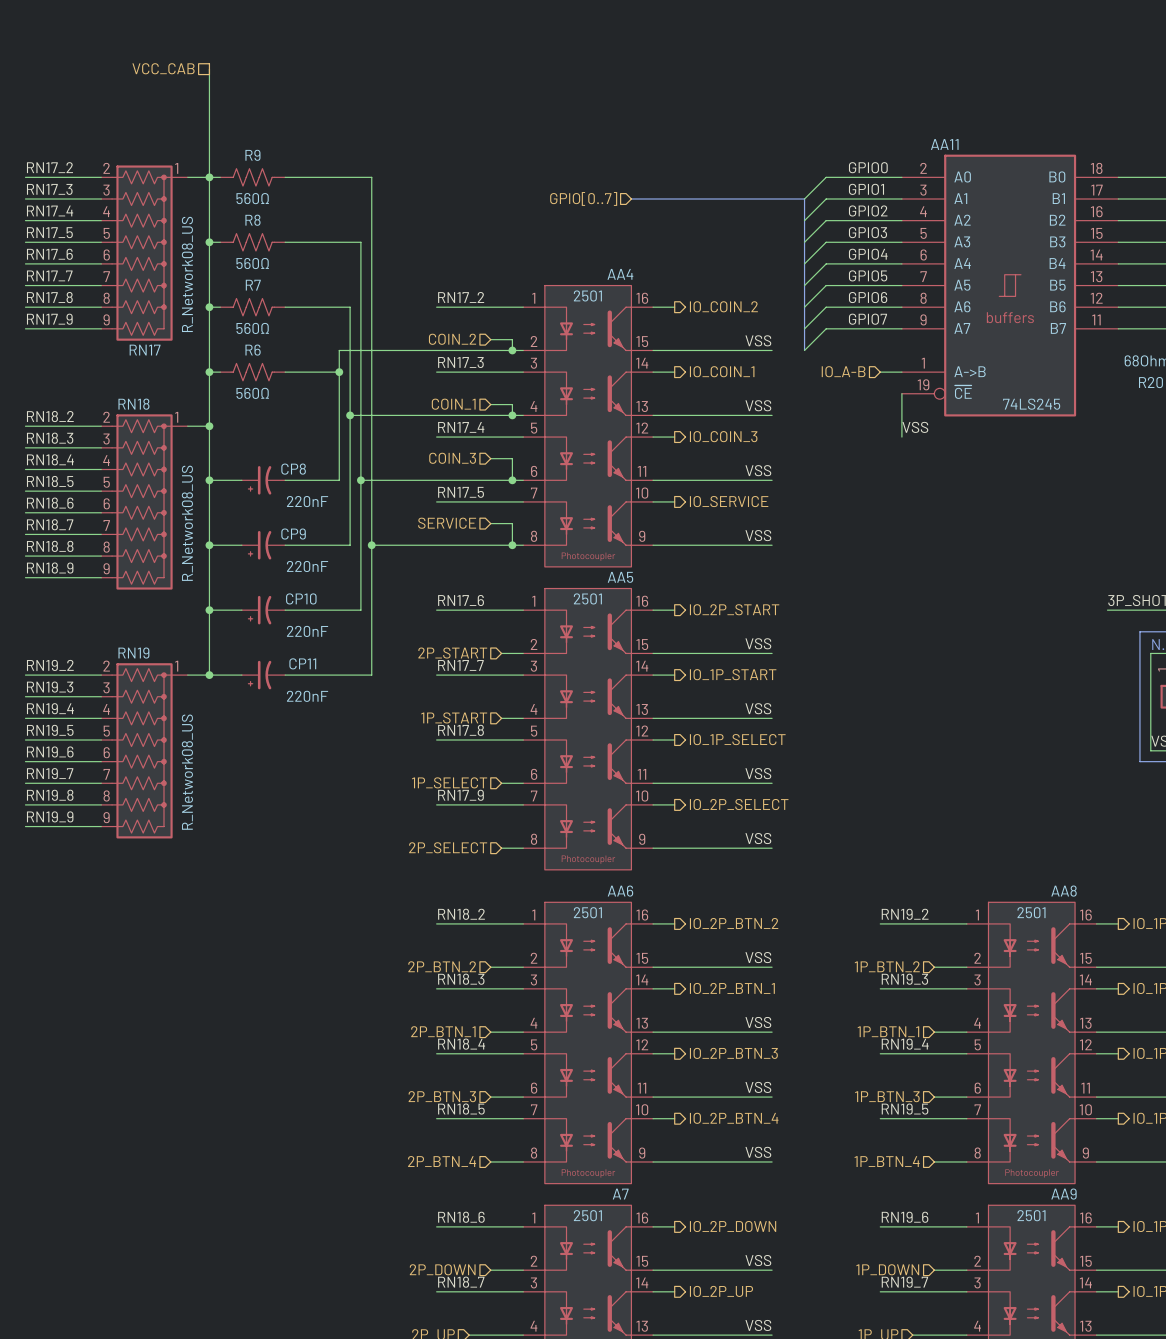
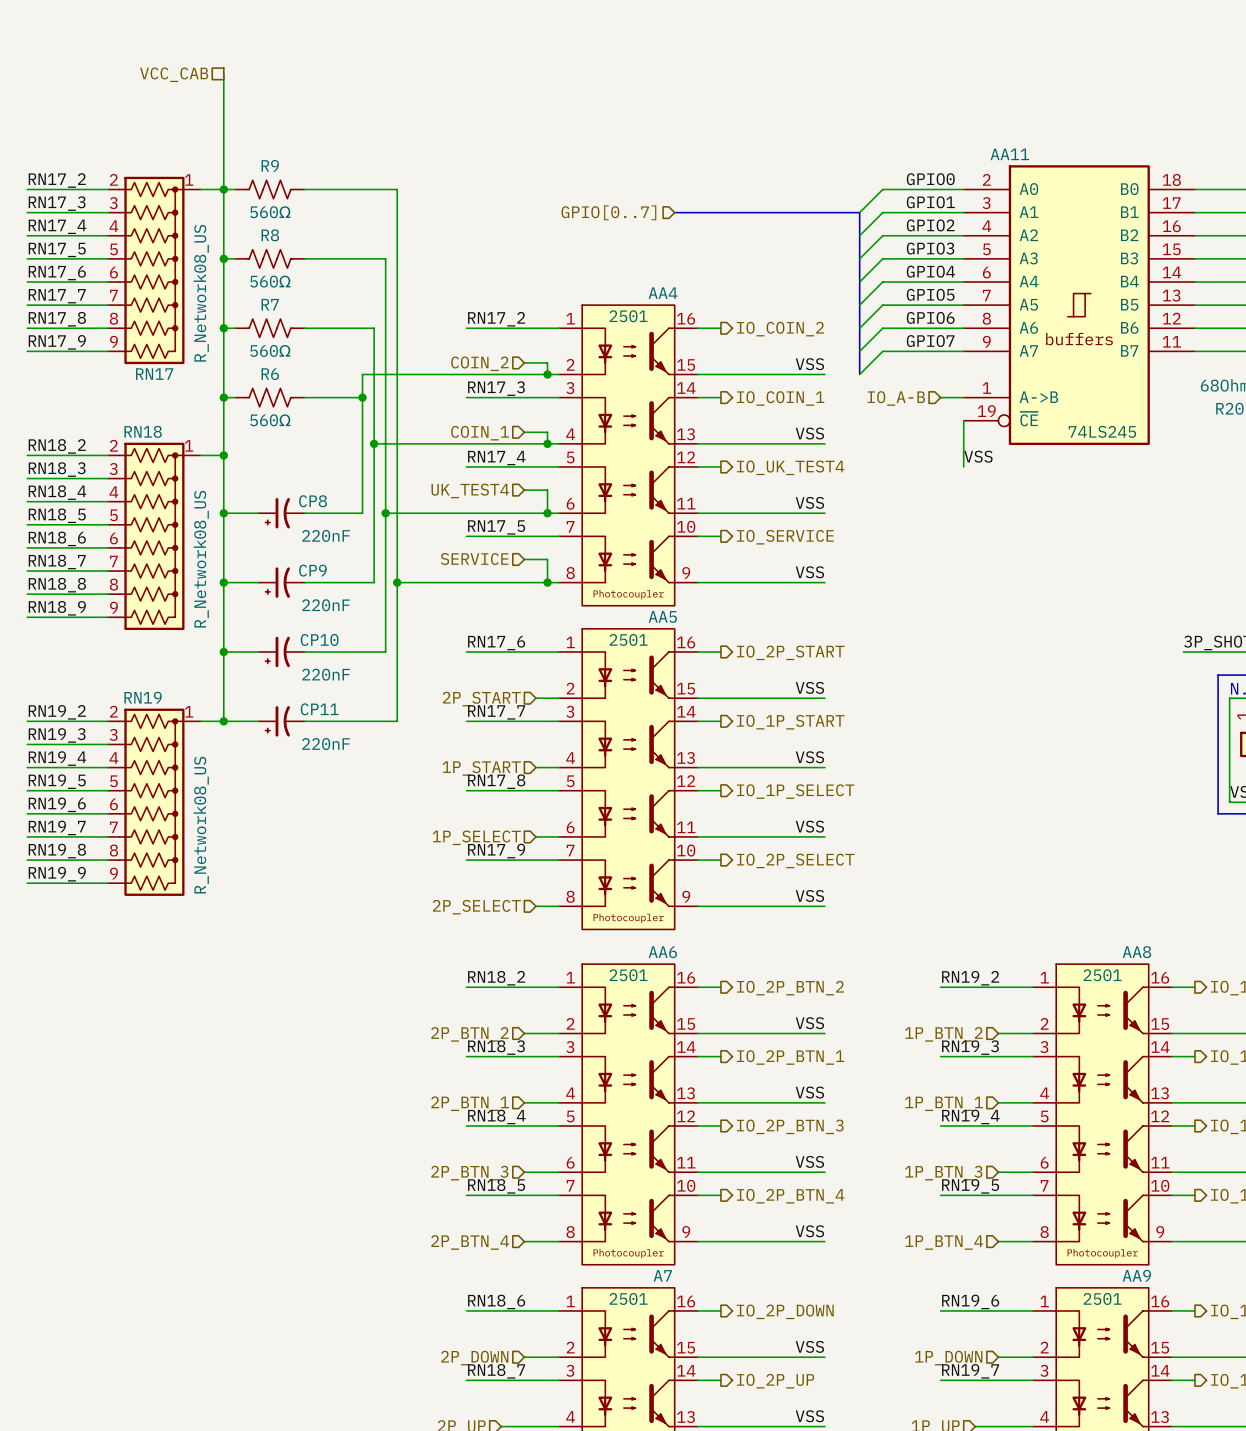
hierarchical label: IO_COIN_3 (723, 436) -> IO_UK_TEST4 (790, 467)
hierarchical label: COIN_3 (452, 458) -> UK_TEST4 (470, 490)

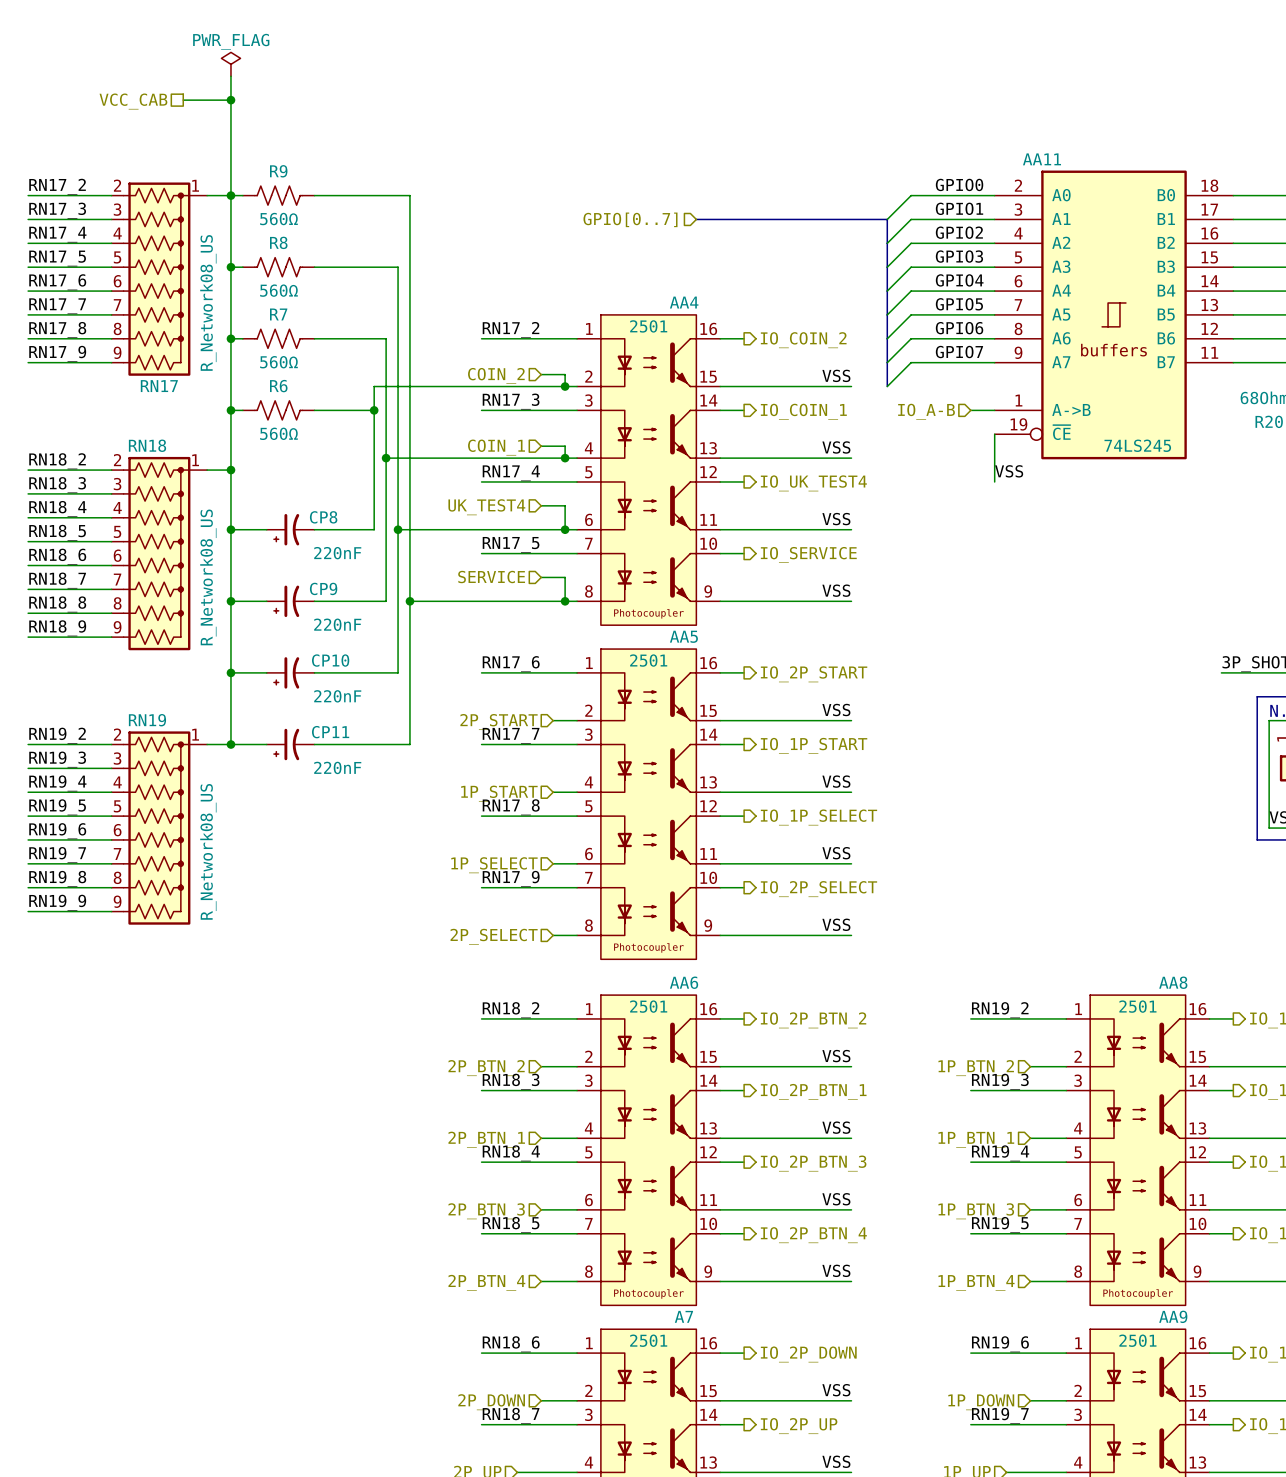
power symbol: none -> PWR_FLAG (230, 64)
hierarchical label position: VCC_CAB (174, 74) -> VCC_CAB (133, 101)
wire: none -> (183, 100) (230, 100)
junction: none -> (230, 100)

